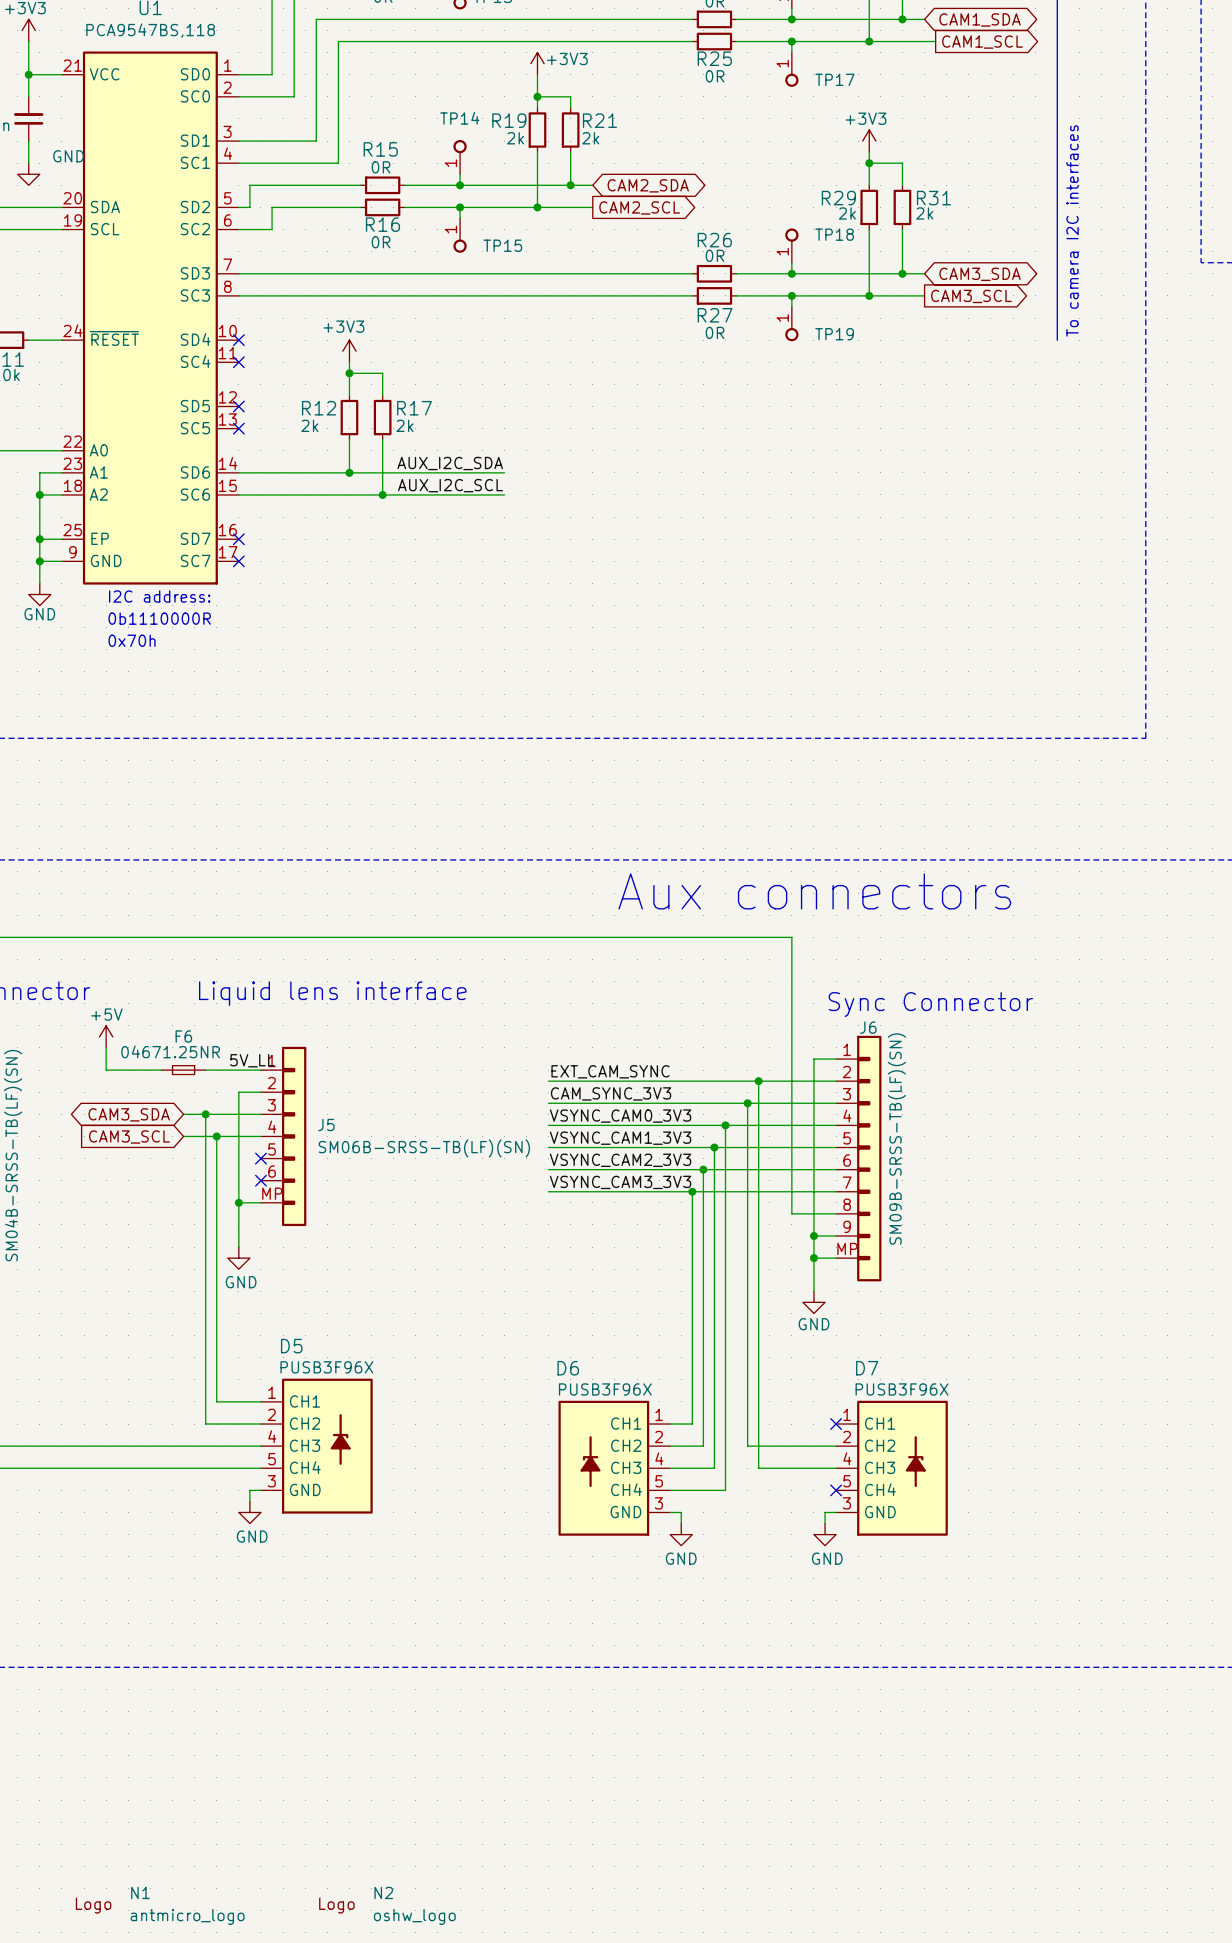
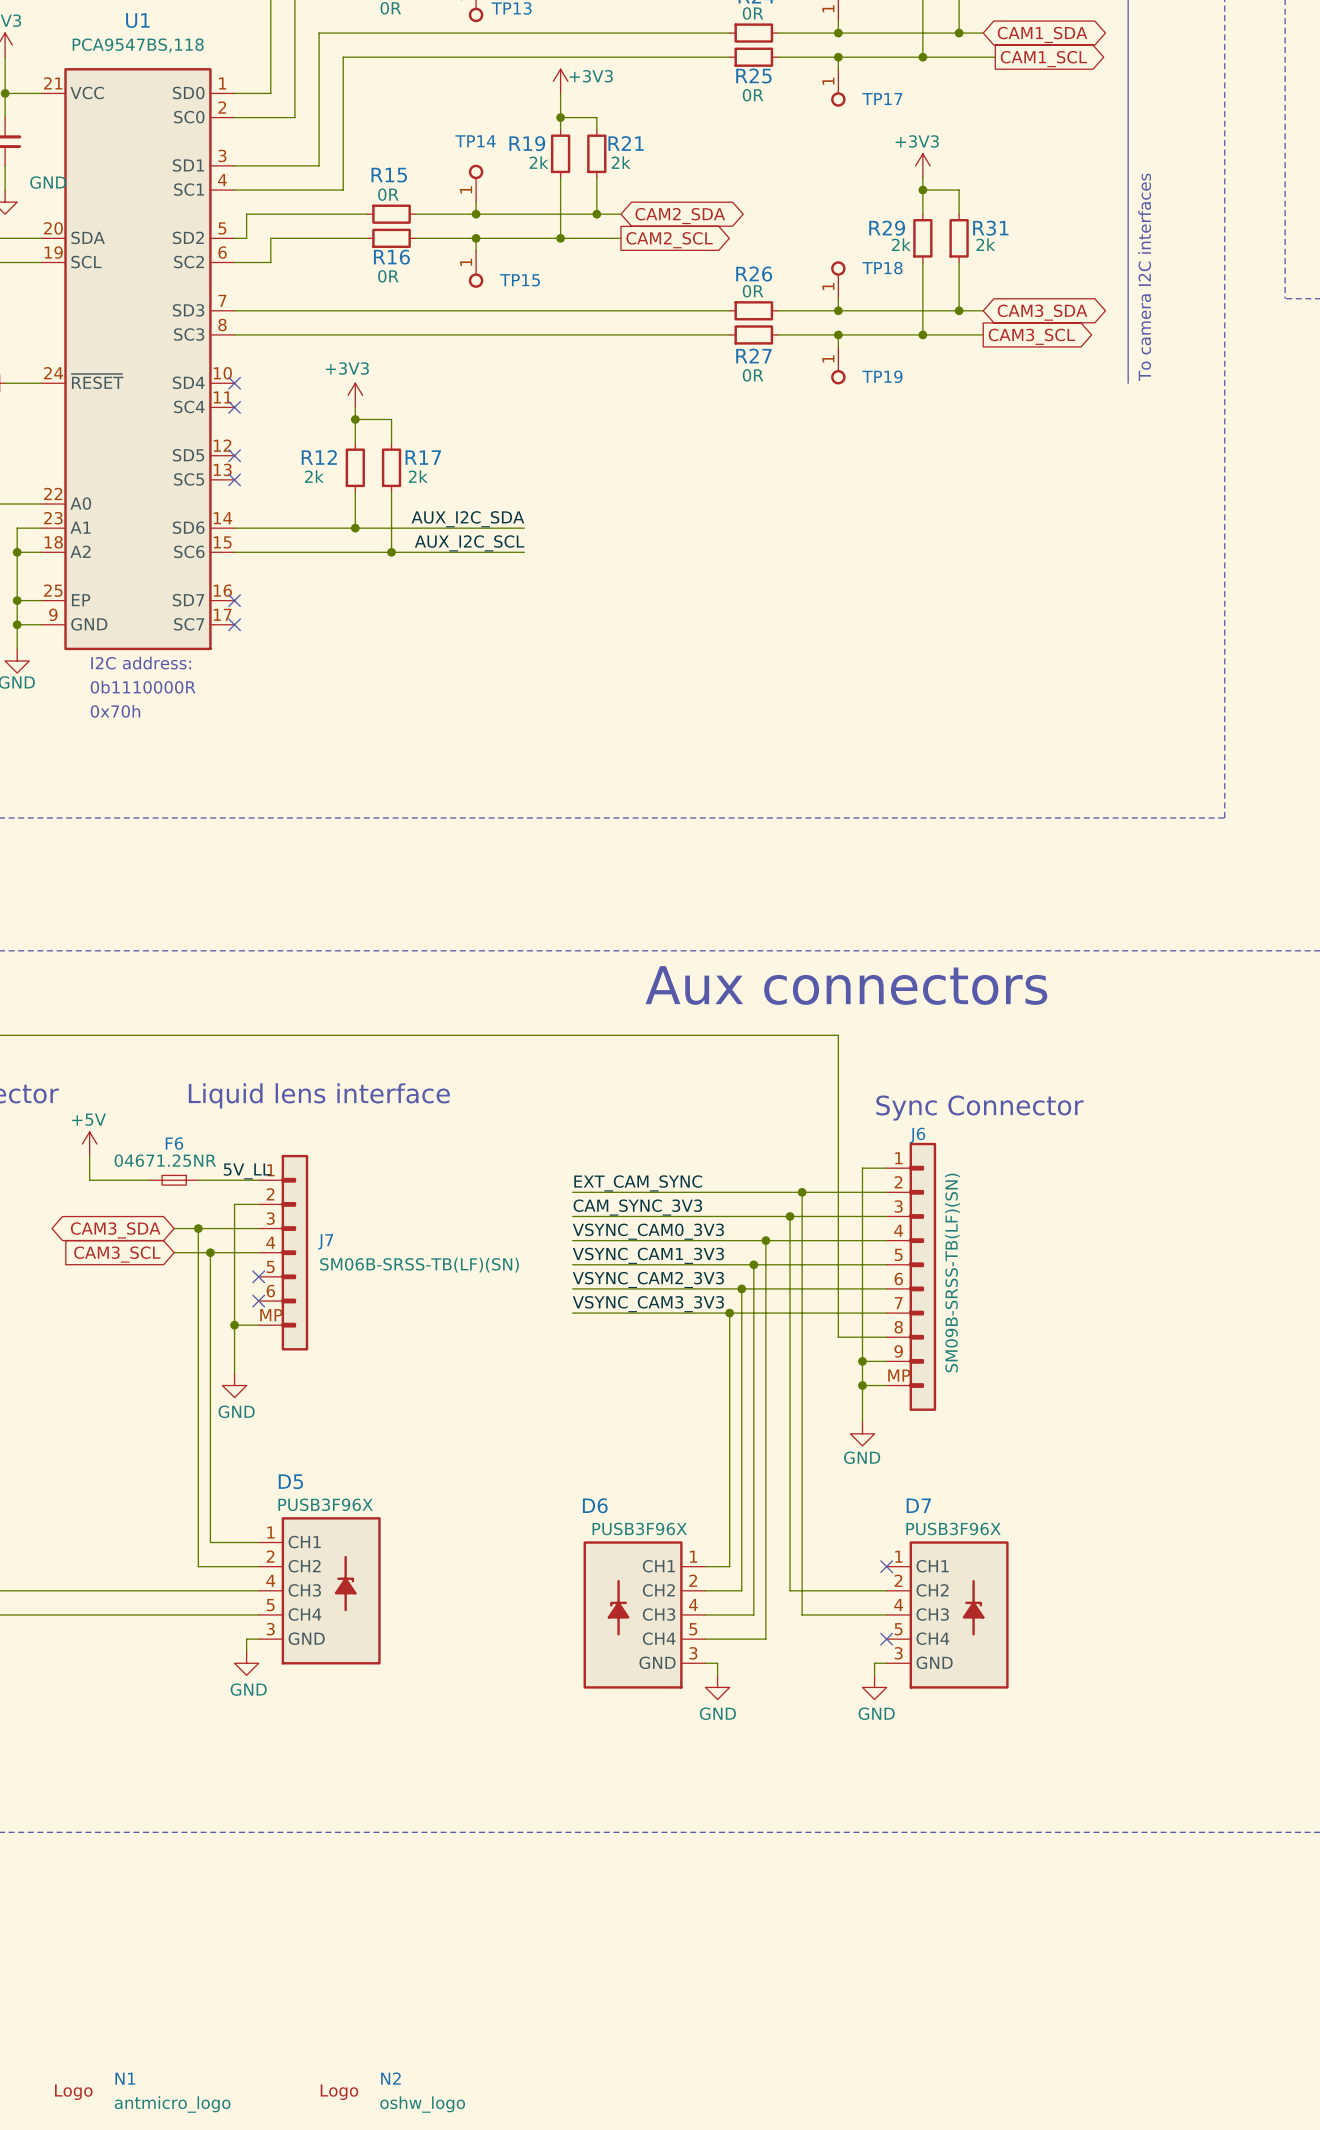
J5 name: J5 (326, 1124) -> J7 (325, 1241)

